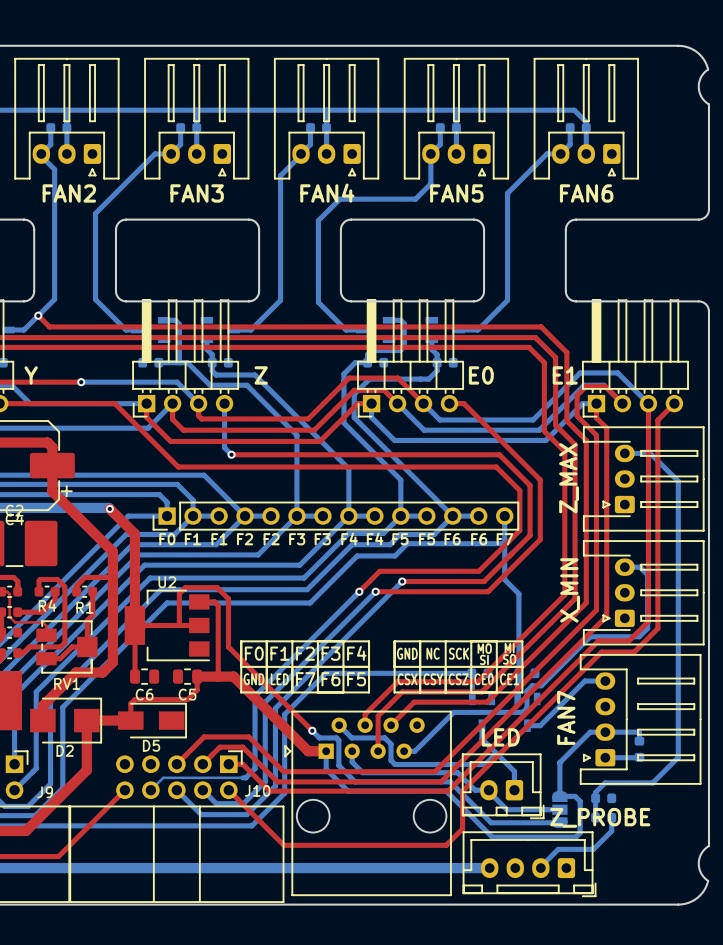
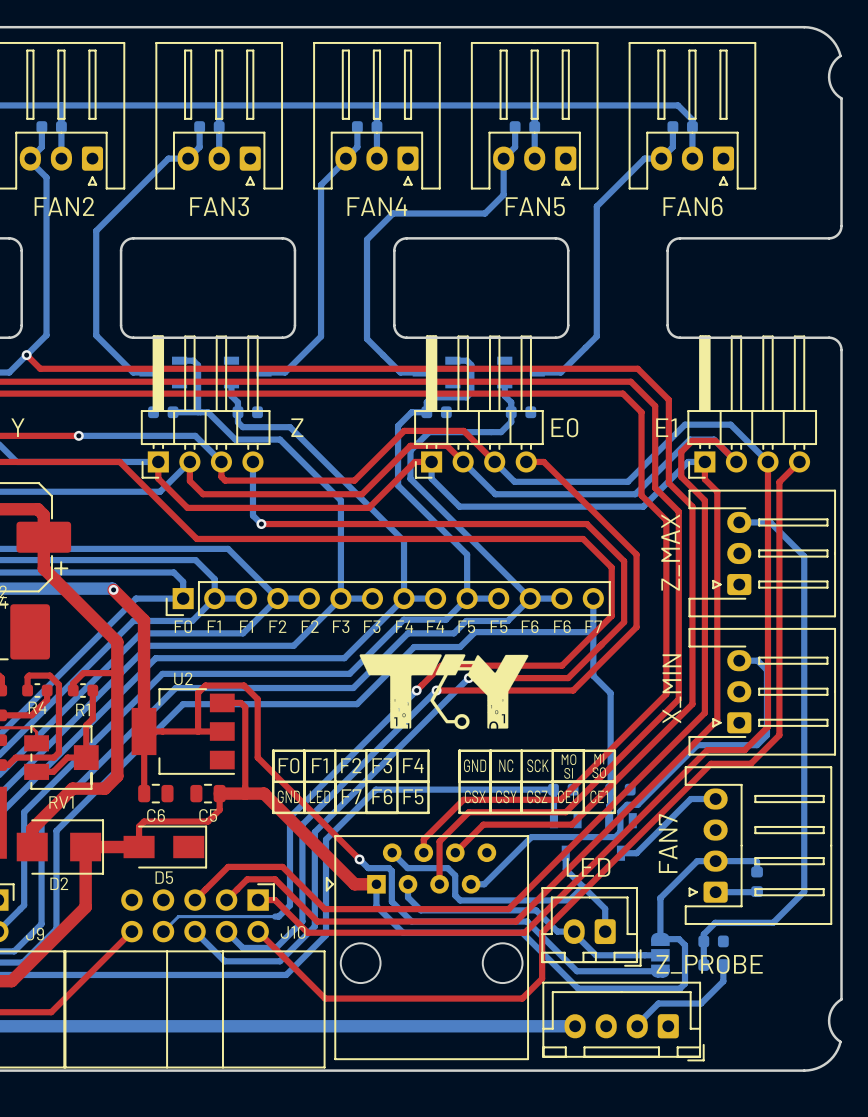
drawing: none -> [359, 654, 529, 730]

